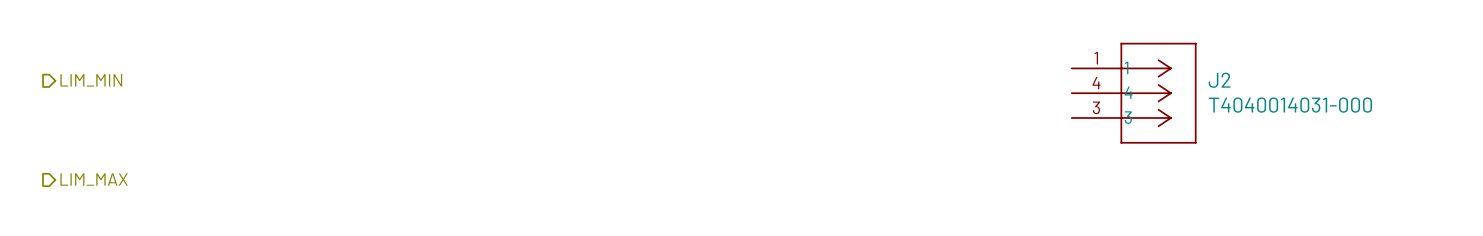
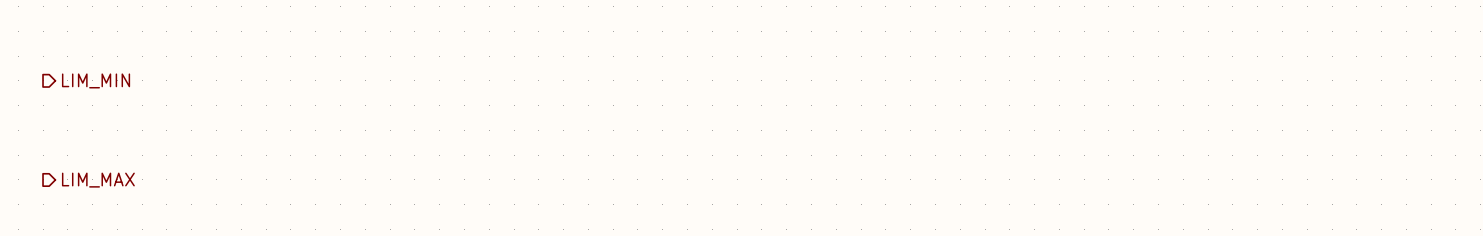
J2: T4040014031-000 (1134, 93) -> none

